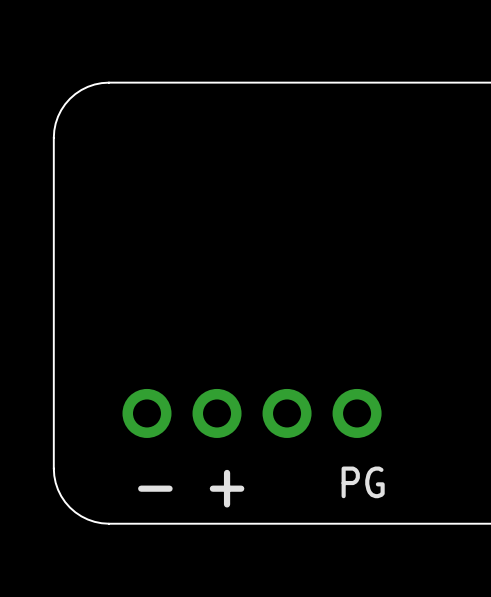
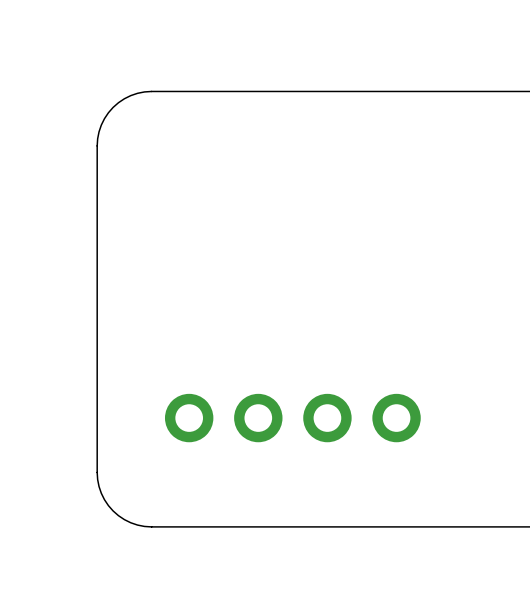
text: PG (363, 482) -> none
text: - (155, 488) -> none
text: + (227, 488) -> none

